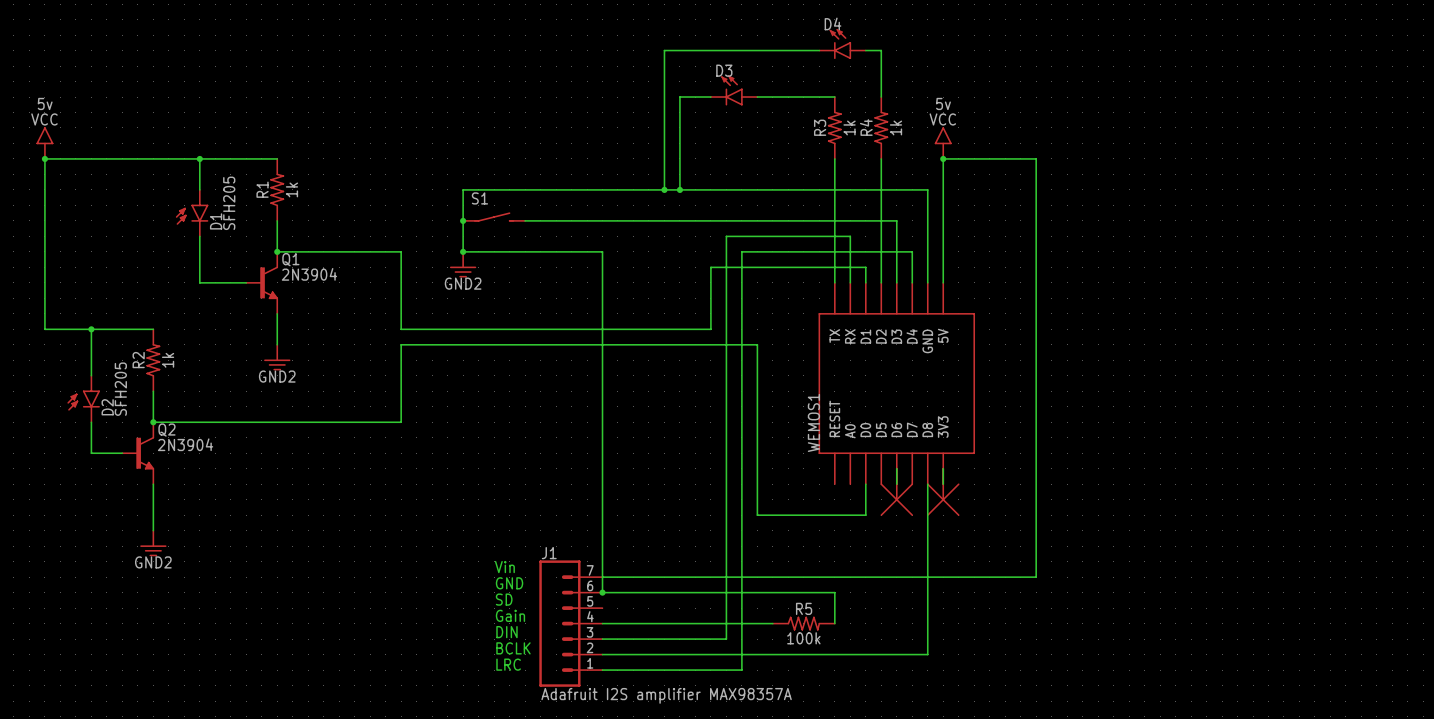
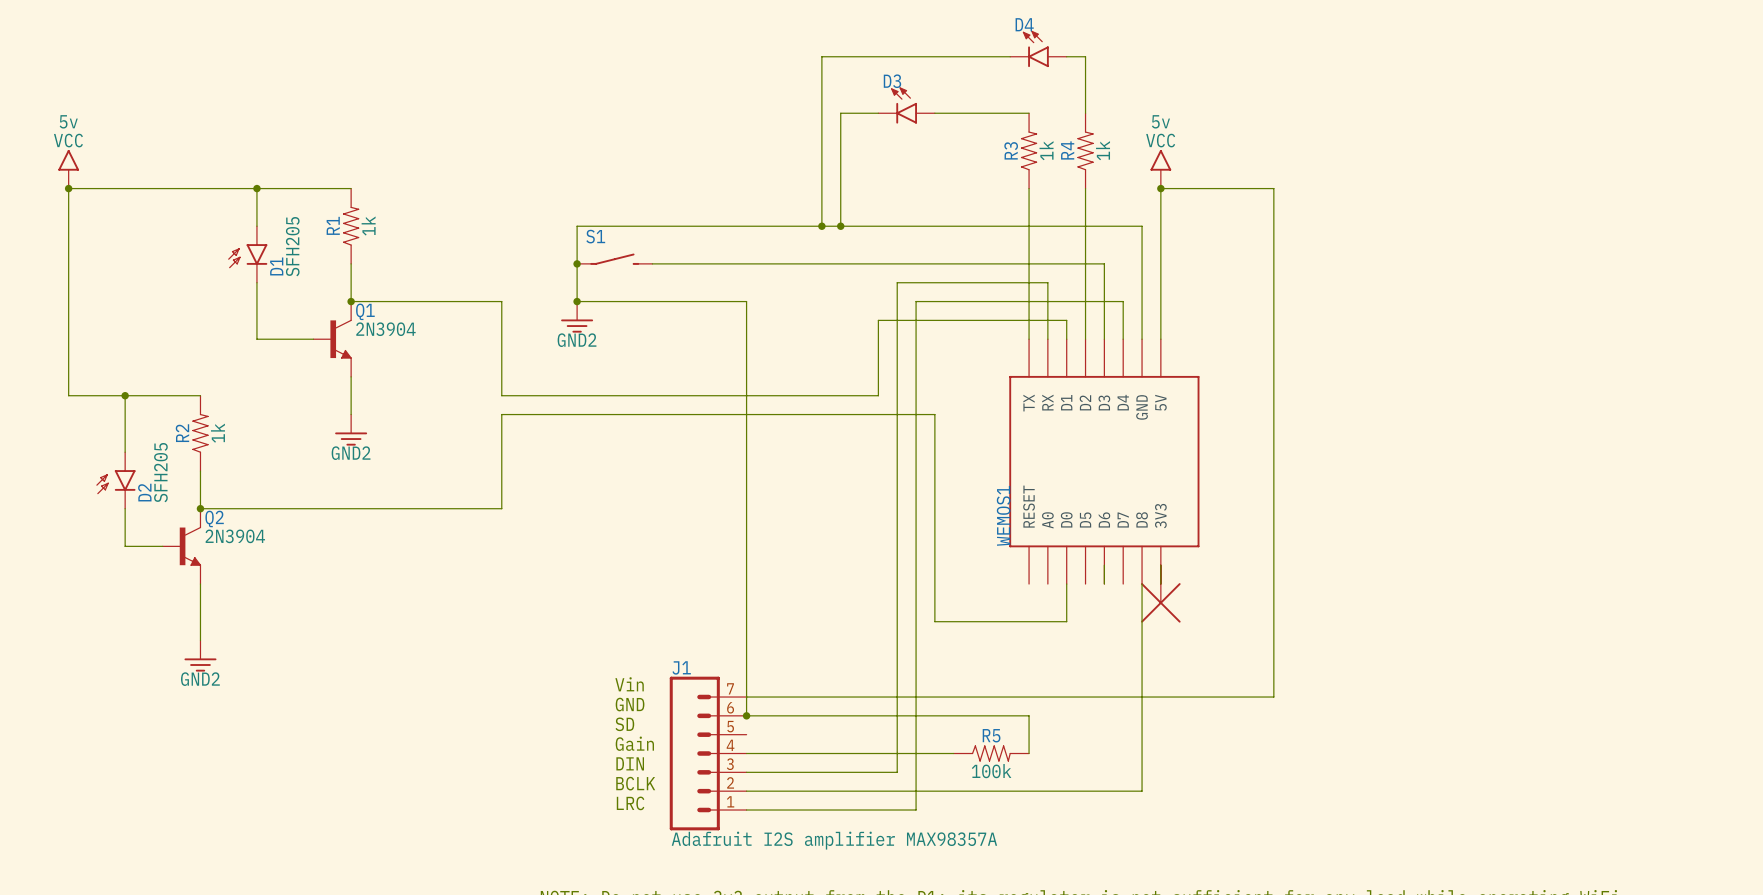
part: (896, 492) -> none

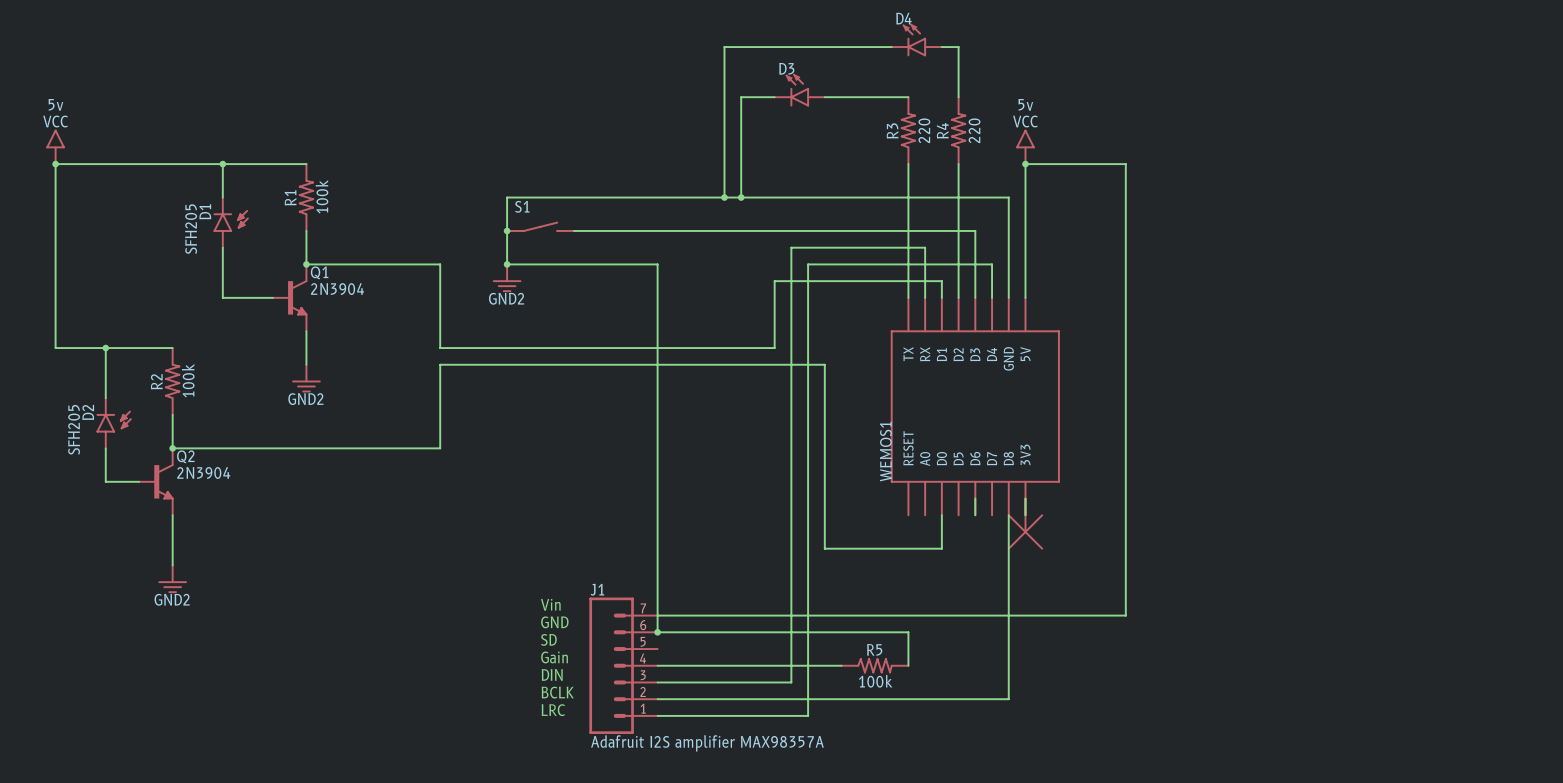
R3 value: 1k (1046, 150) -> 220 (924, 130)
R4 value: 1k (1103, 150) -> 220 (974, 130)
R1 value: 1k (368, 226) -> 100k (322, 196)
D1 rotation: 0° (247, 246) -> 180° (231, 229)
R2 value: 1k (217, 433) -> 100k (188, 380)
D2 rotation: 0° (115, 472) -> 180° (113, 429)

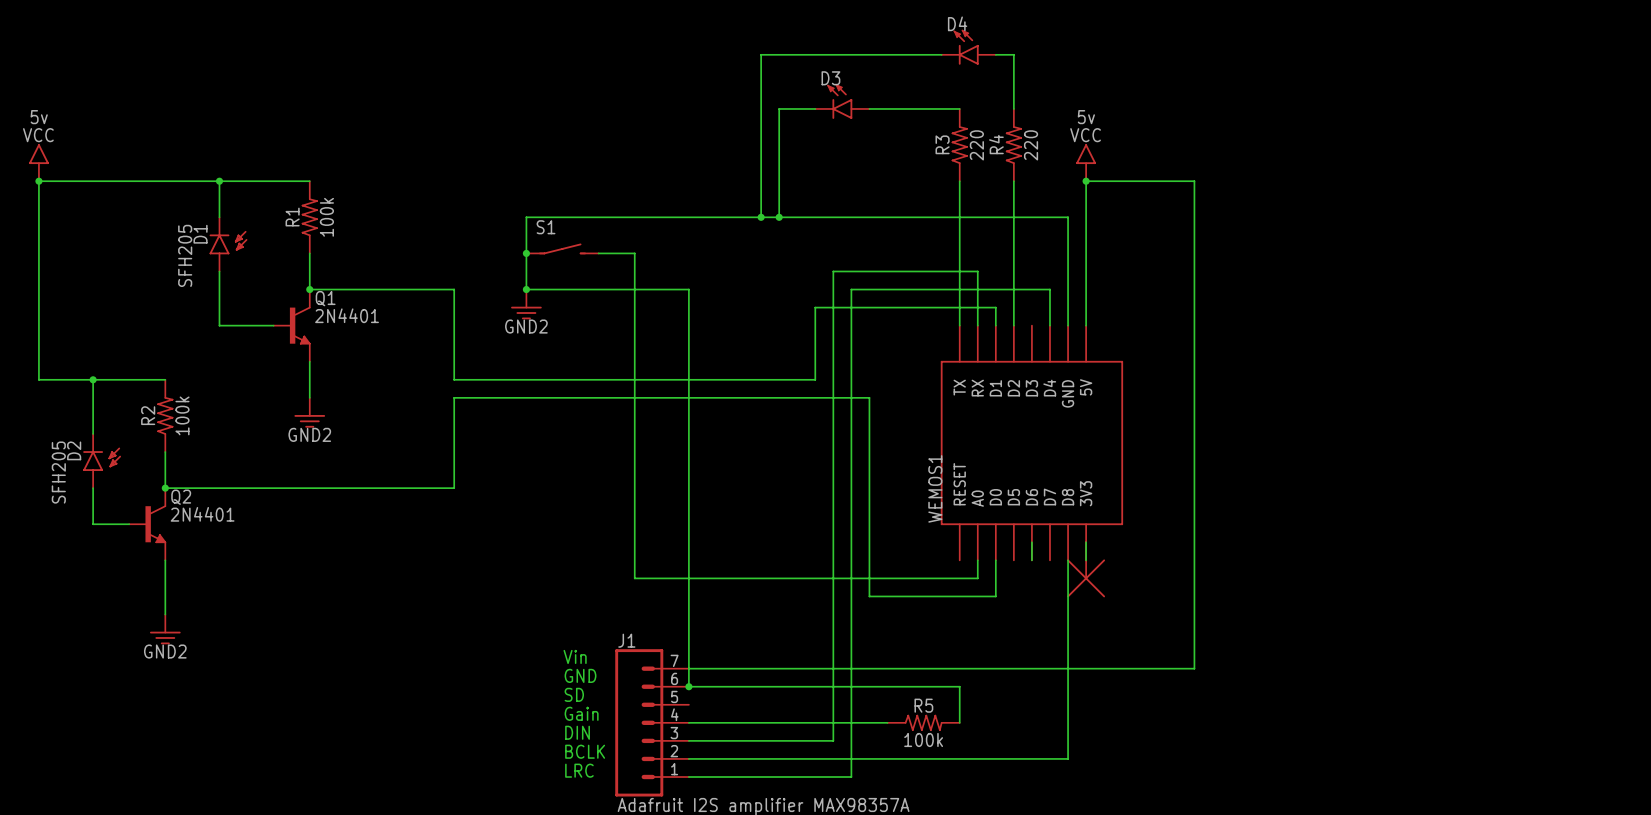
wire: (607, 230) (975, 230) (975, 297) -> (634, 253) (634, 578) (977, 578) (977, 560)
Q1 value: 2N3904 (337, 289) -> 2N4401 (347, 315)
Q2 value: 2N3904 (203, 472) -> 2N4401 (202, 514)

